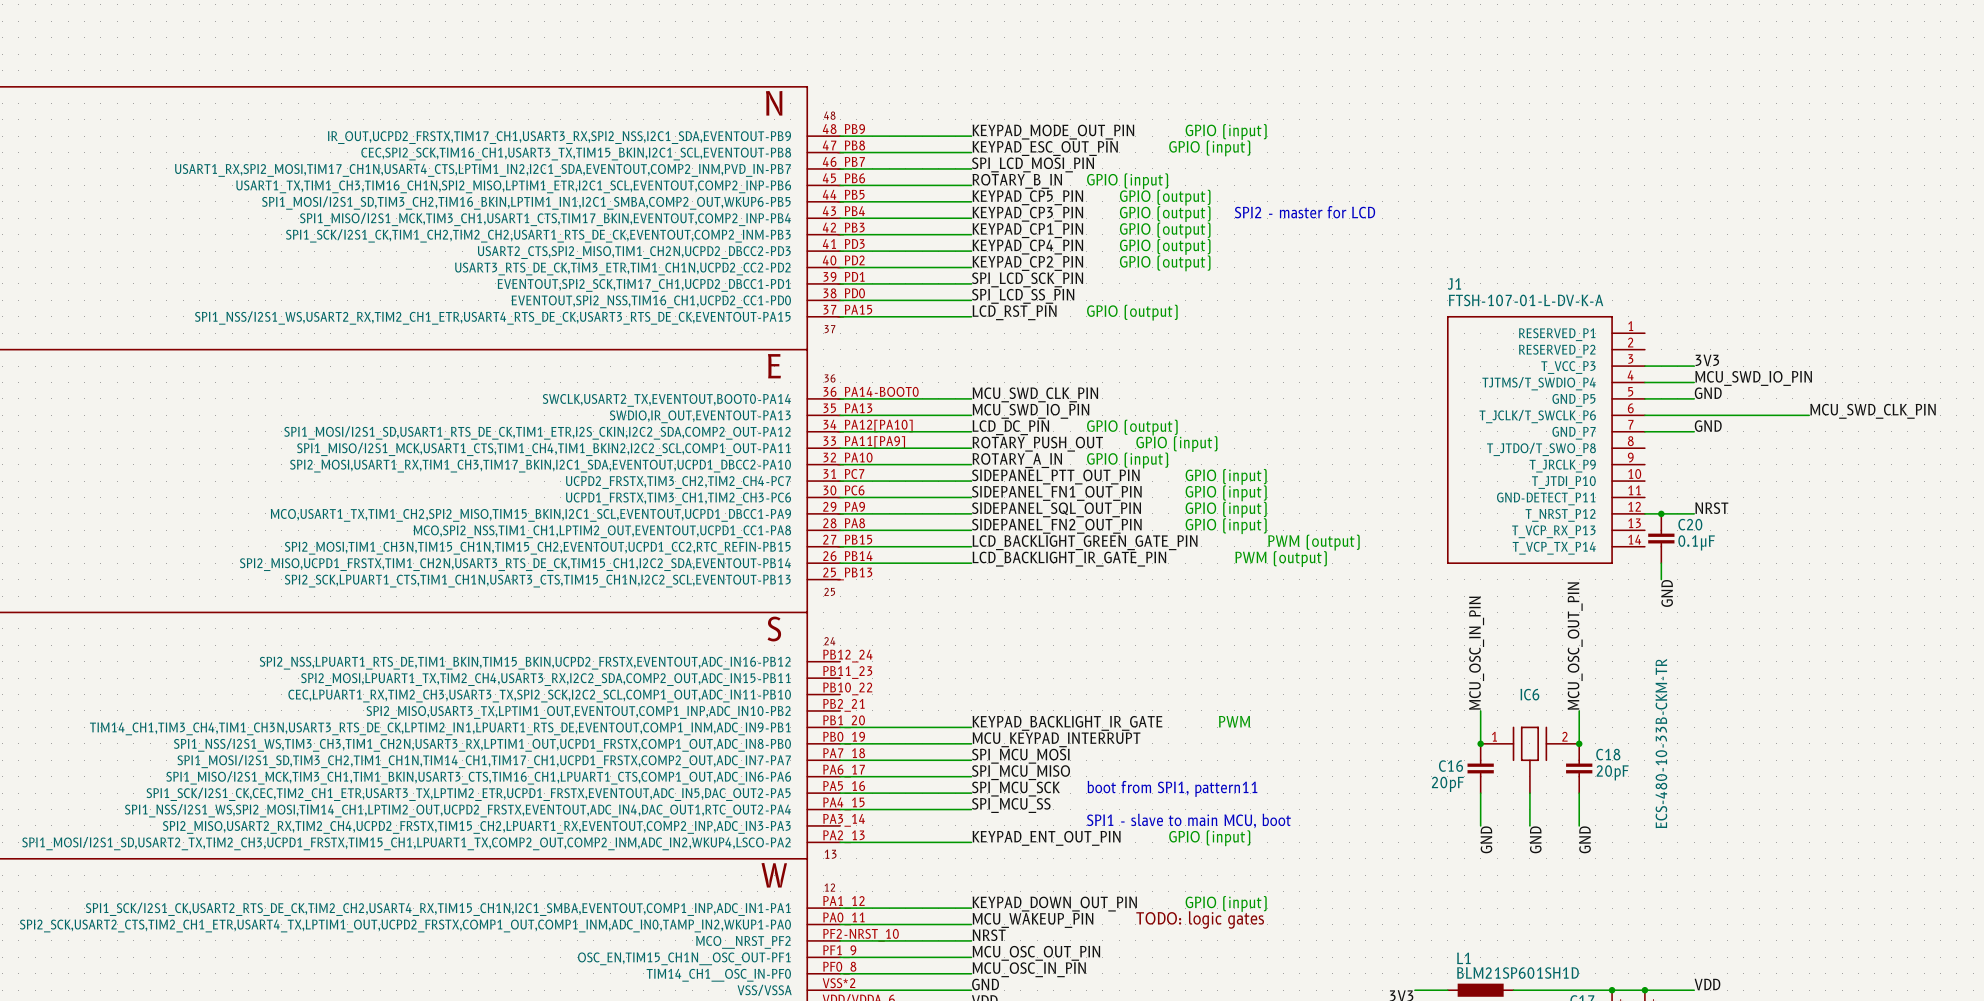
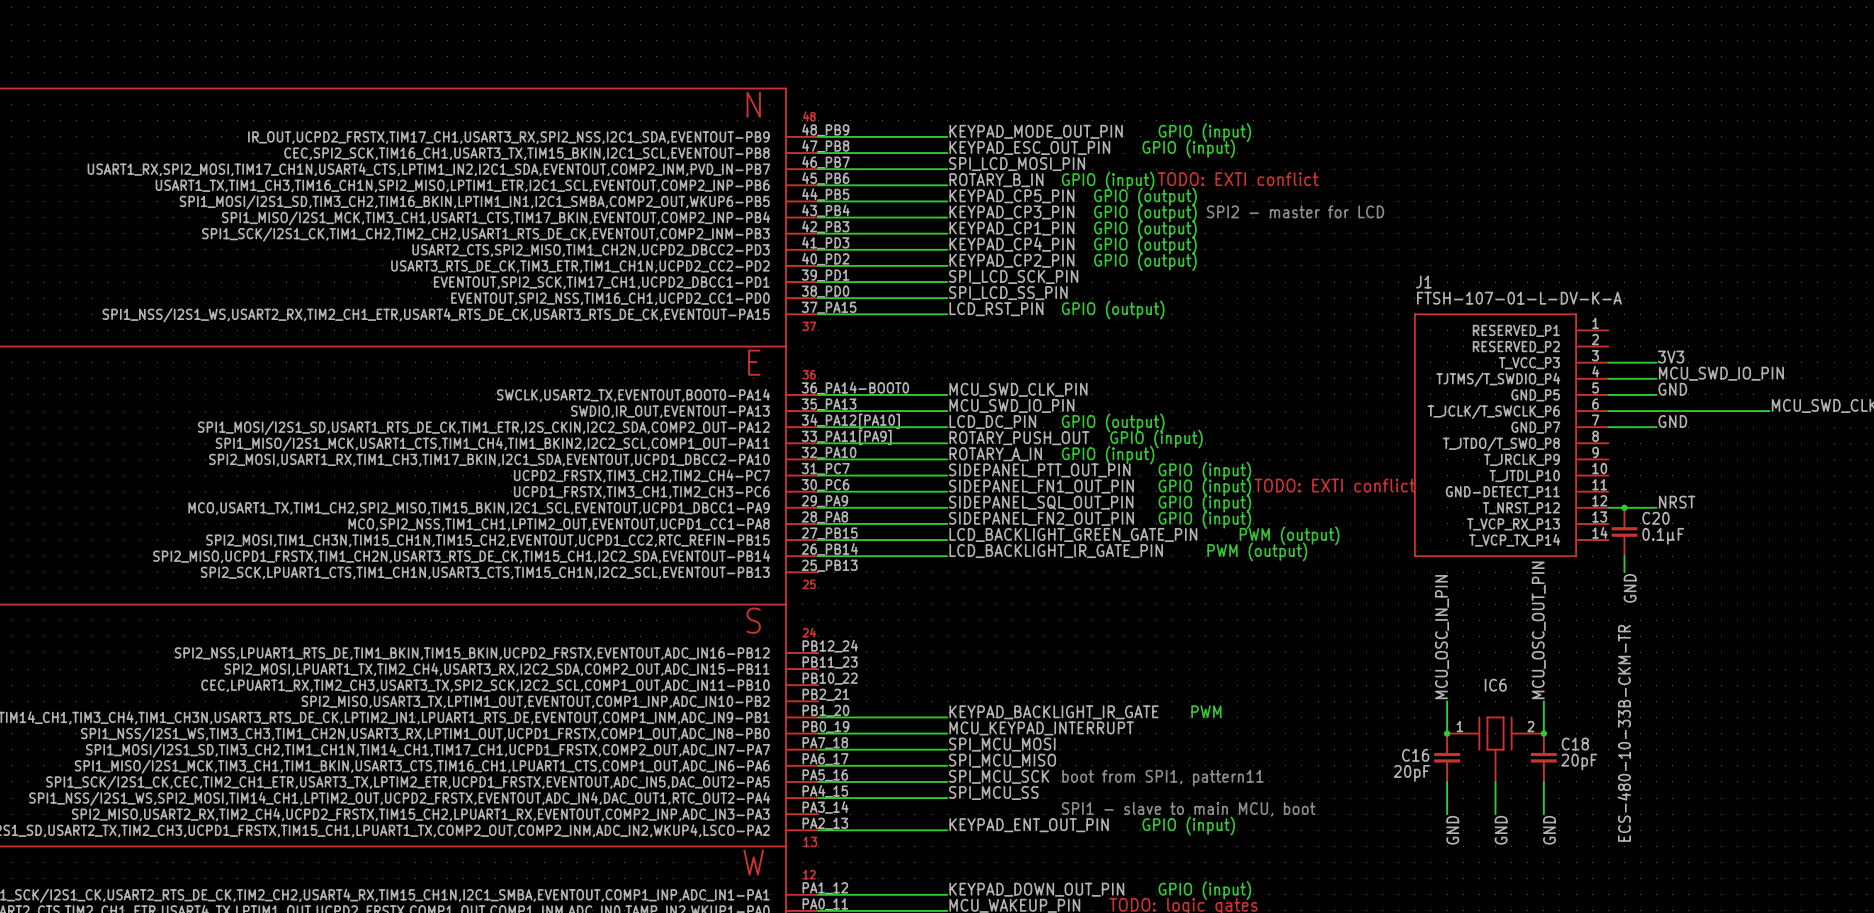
text: none -> TODO: EXTI conflict (1238, 179)
text: none -> TODO: EXTI conflict (1334, 485)

